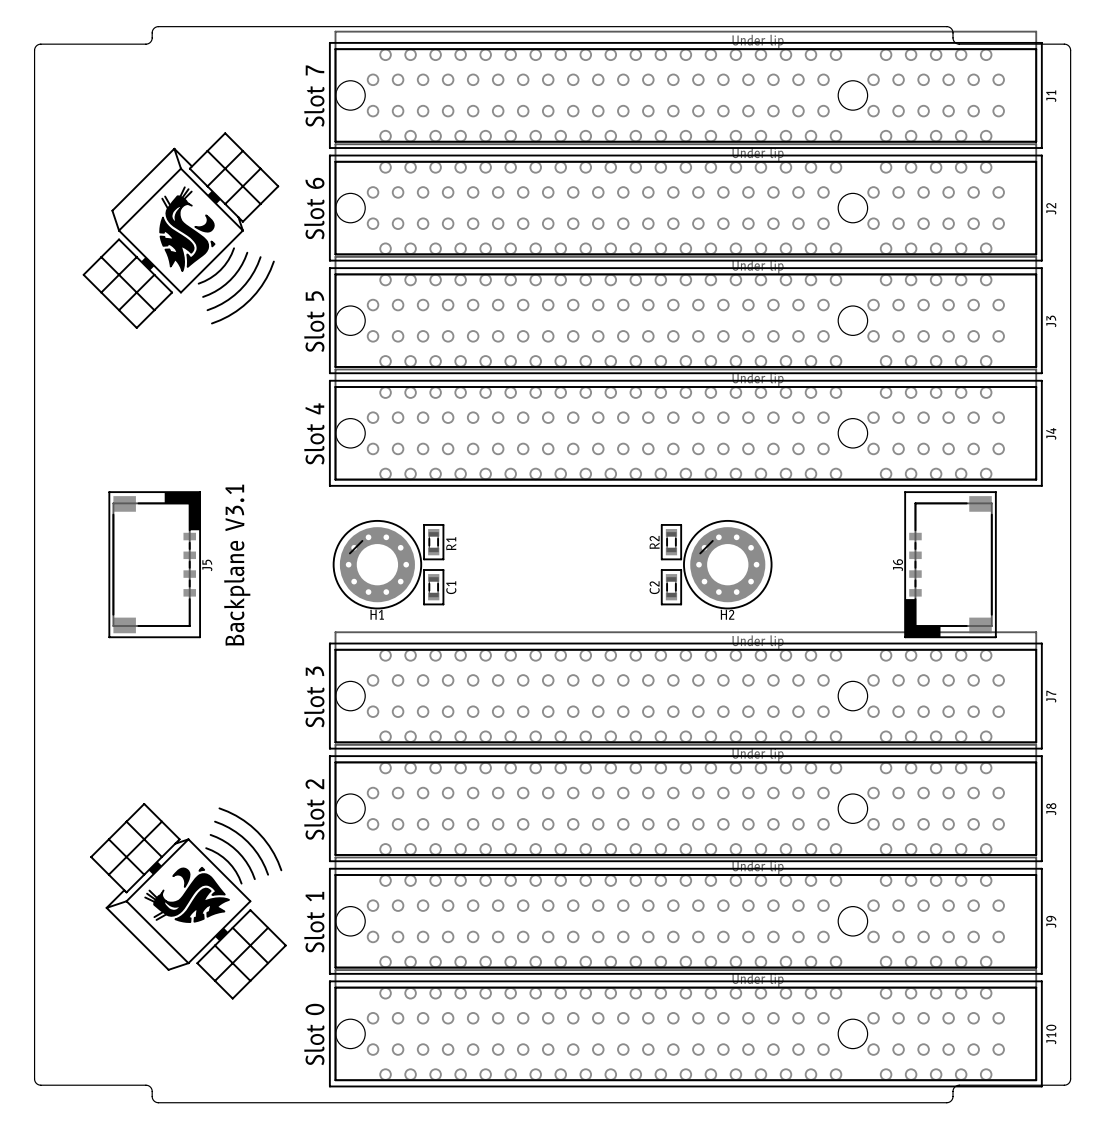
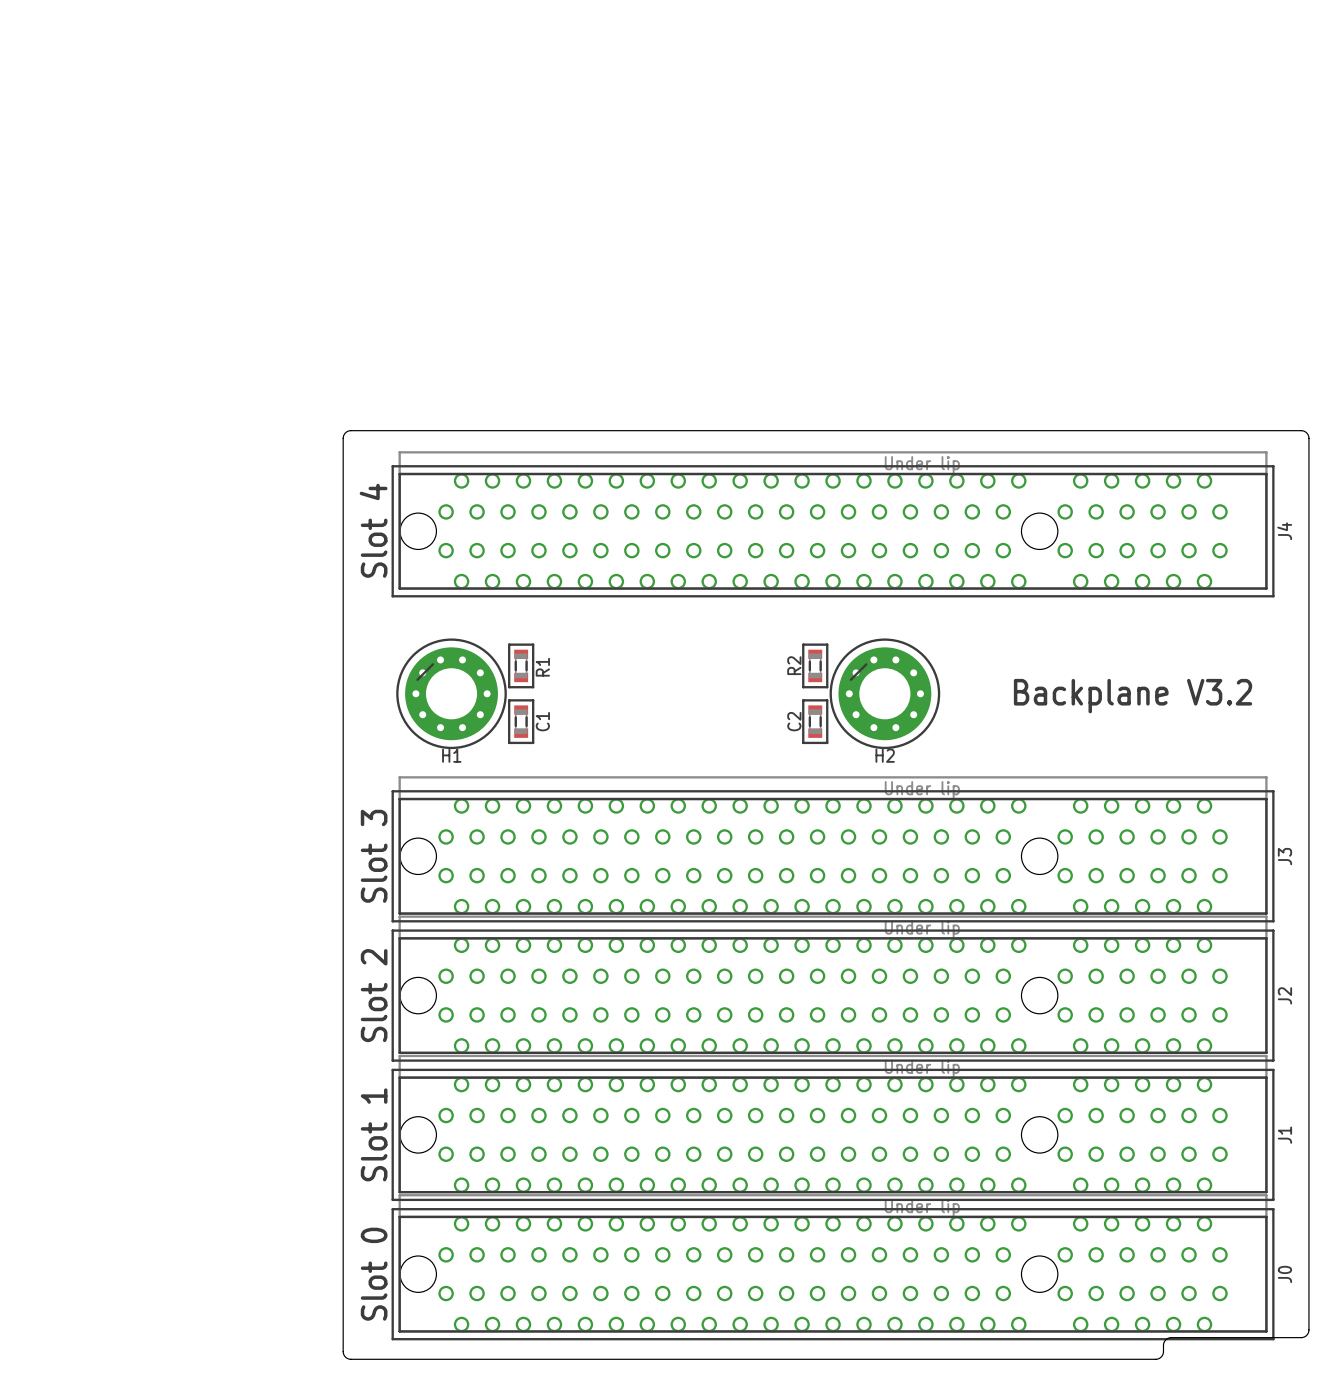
J1: (685, 89) -> none
text: Slot 7 (314, 96) -> none
drawing: [82, 132, 280, 329] -> none
J2: (685, 202) -> none
text: Slot 6 (314, 208) -> none
J3: (685, 315) -> none
text: Slot 5 (314, 321) -> none
board edge: (1070, 358) (1070, 50) (1065, 44) (958, 44) (953, 40) (951, 29) (946, 26) (158, 26) (153, 29) (151, 40) (146, 44) (40, 44) (36, 45) (34, 50) (34, 1080) (40, 1085) (146, 1085) (151, 1088) (152, 1098) (157, 1102) (296, 1102) -> (1308, 438) (1306, 432) (1301, 430) (350, 430) (345, 432) (343, 438) (343, 1351) (345, 1357) (350, 1359)
J5: (154, 564) -> none
J6: (950, 564) -> none
text: Backplane V3.1 (237, 565) -> none
text: none -> Backplane V3.2 (1133, 696)
J7 name: J7 (1051, 696) -> J3 (1284, 856)
drawing: [90, 803, 287, 1000] -> none
J8 name: J8 (1051, 809) -> J2 (1284, 995)
J9 name: J9 (1051, 921) -> J1 (1284, 1135)
J10 name: J10 (1051, 1034) -> J0 (1284, 1274)

